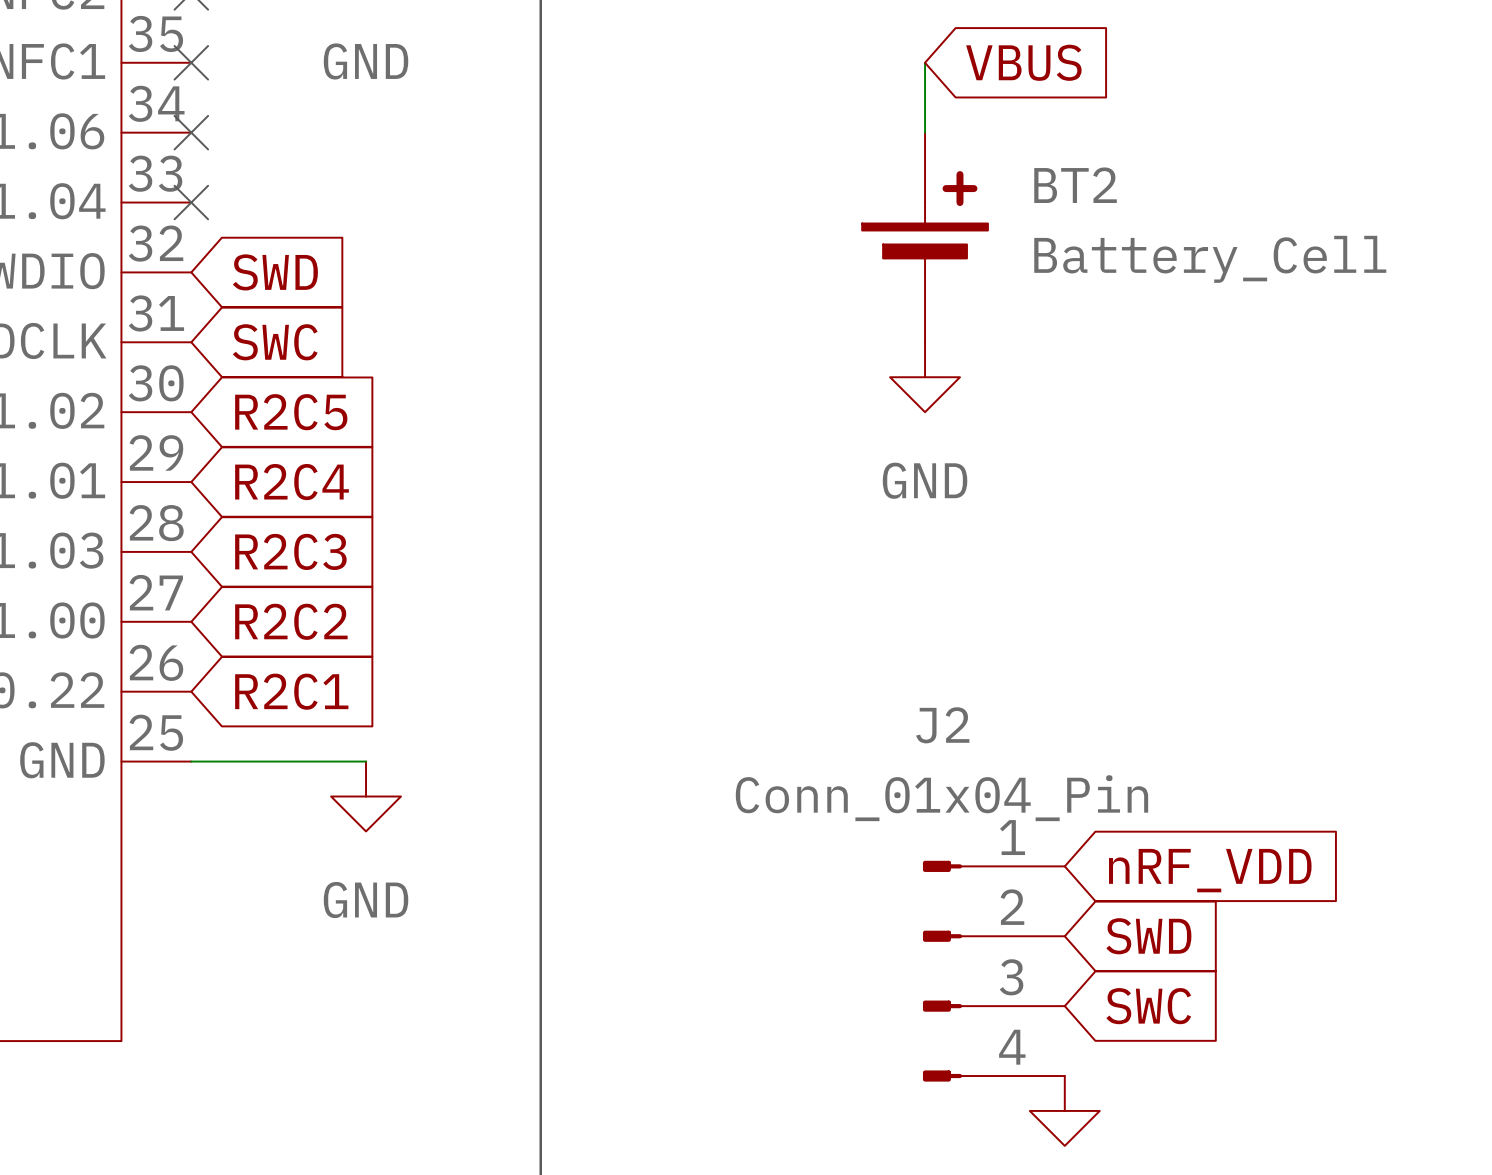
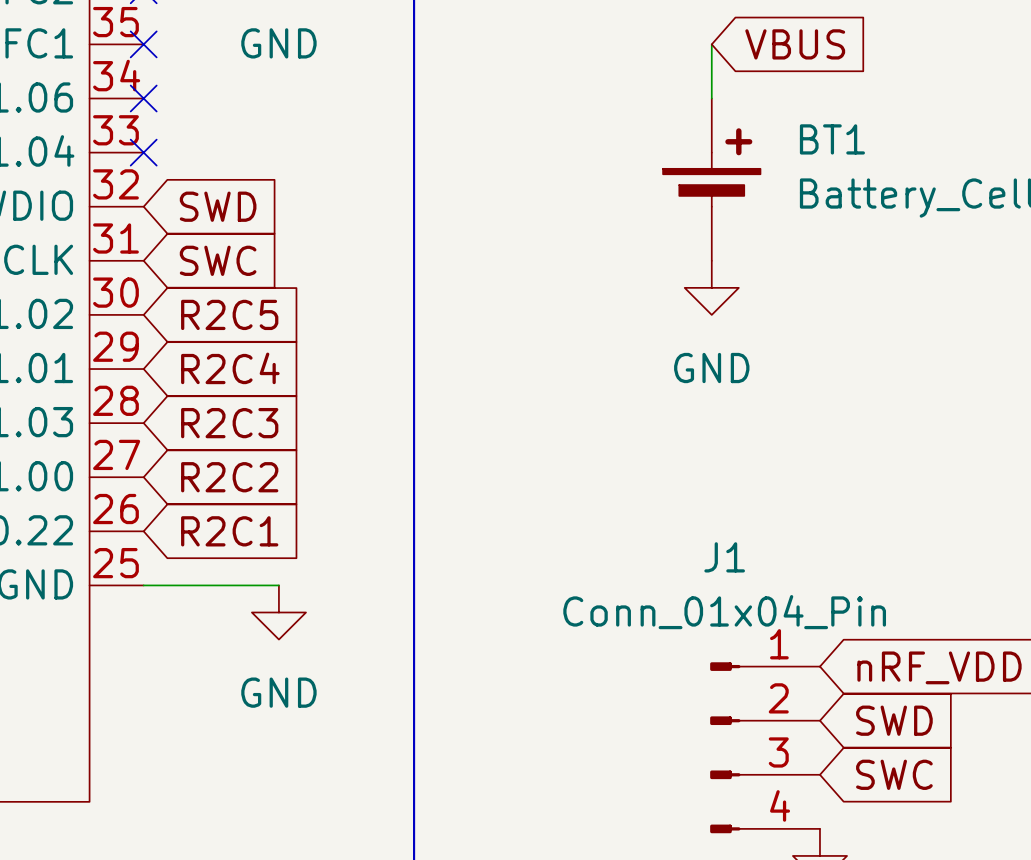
BT2 name: BT2 (1075, 185) -> BT1 (832, 139)
J2 name: J2 (942, 725) -> J1 (724, 557)

